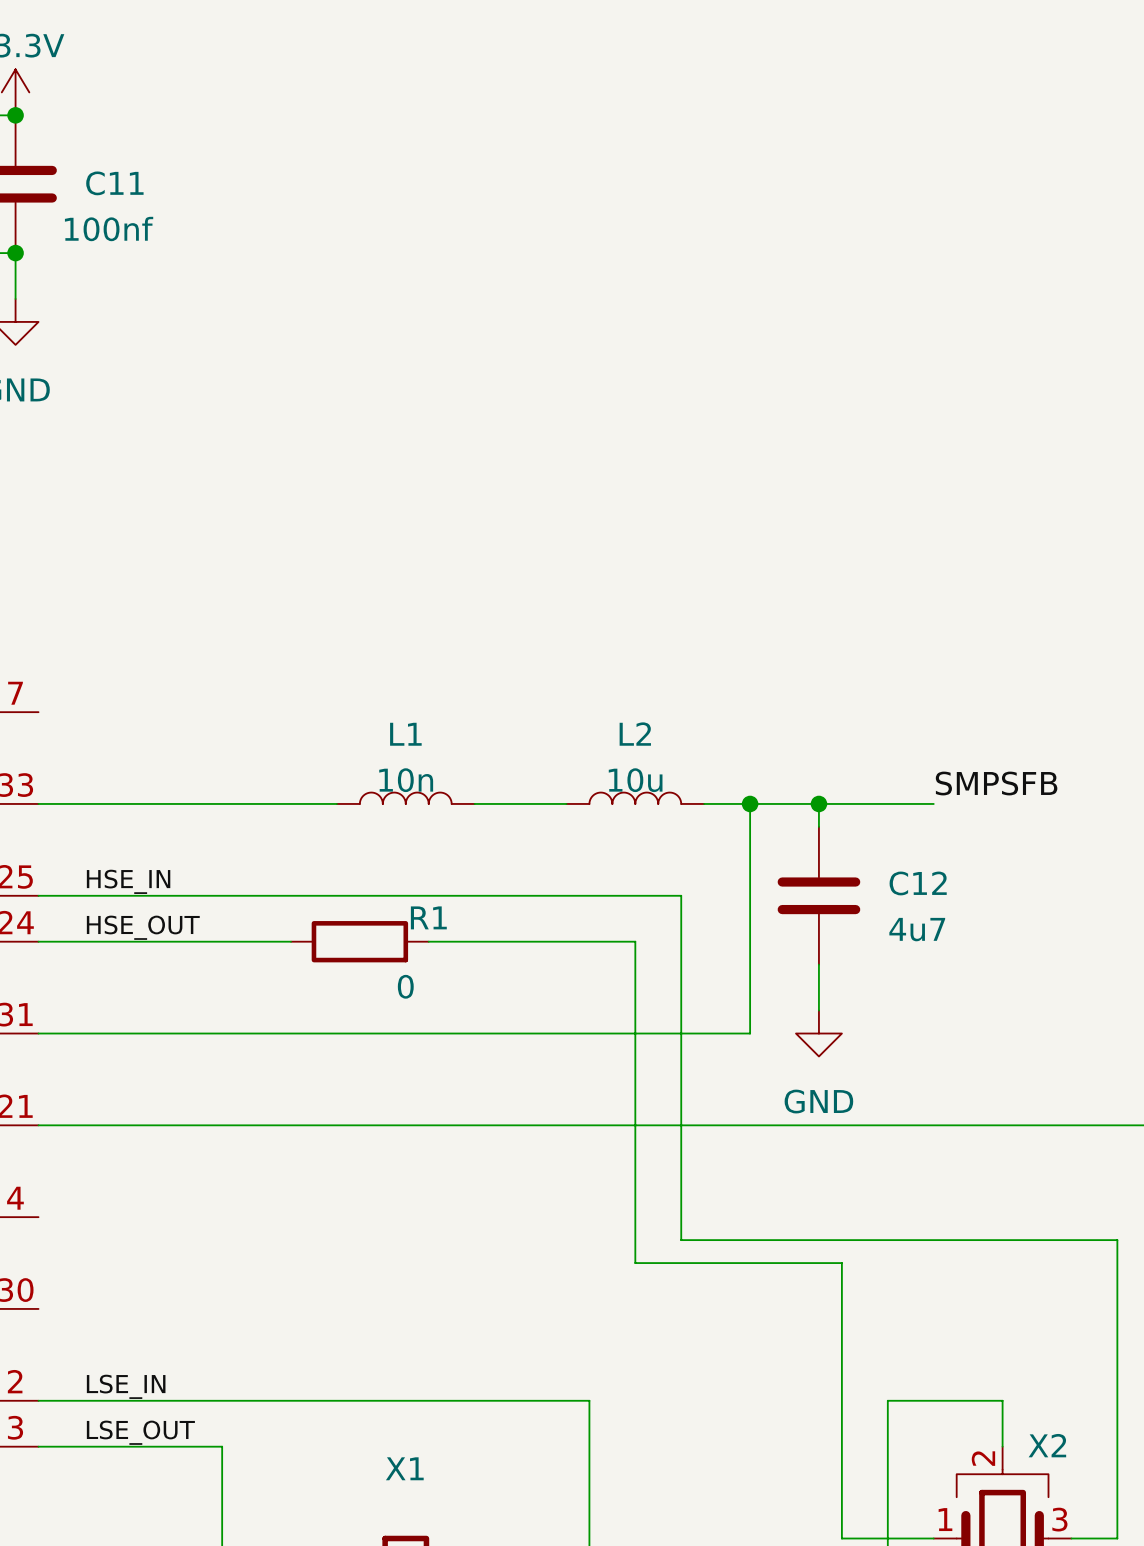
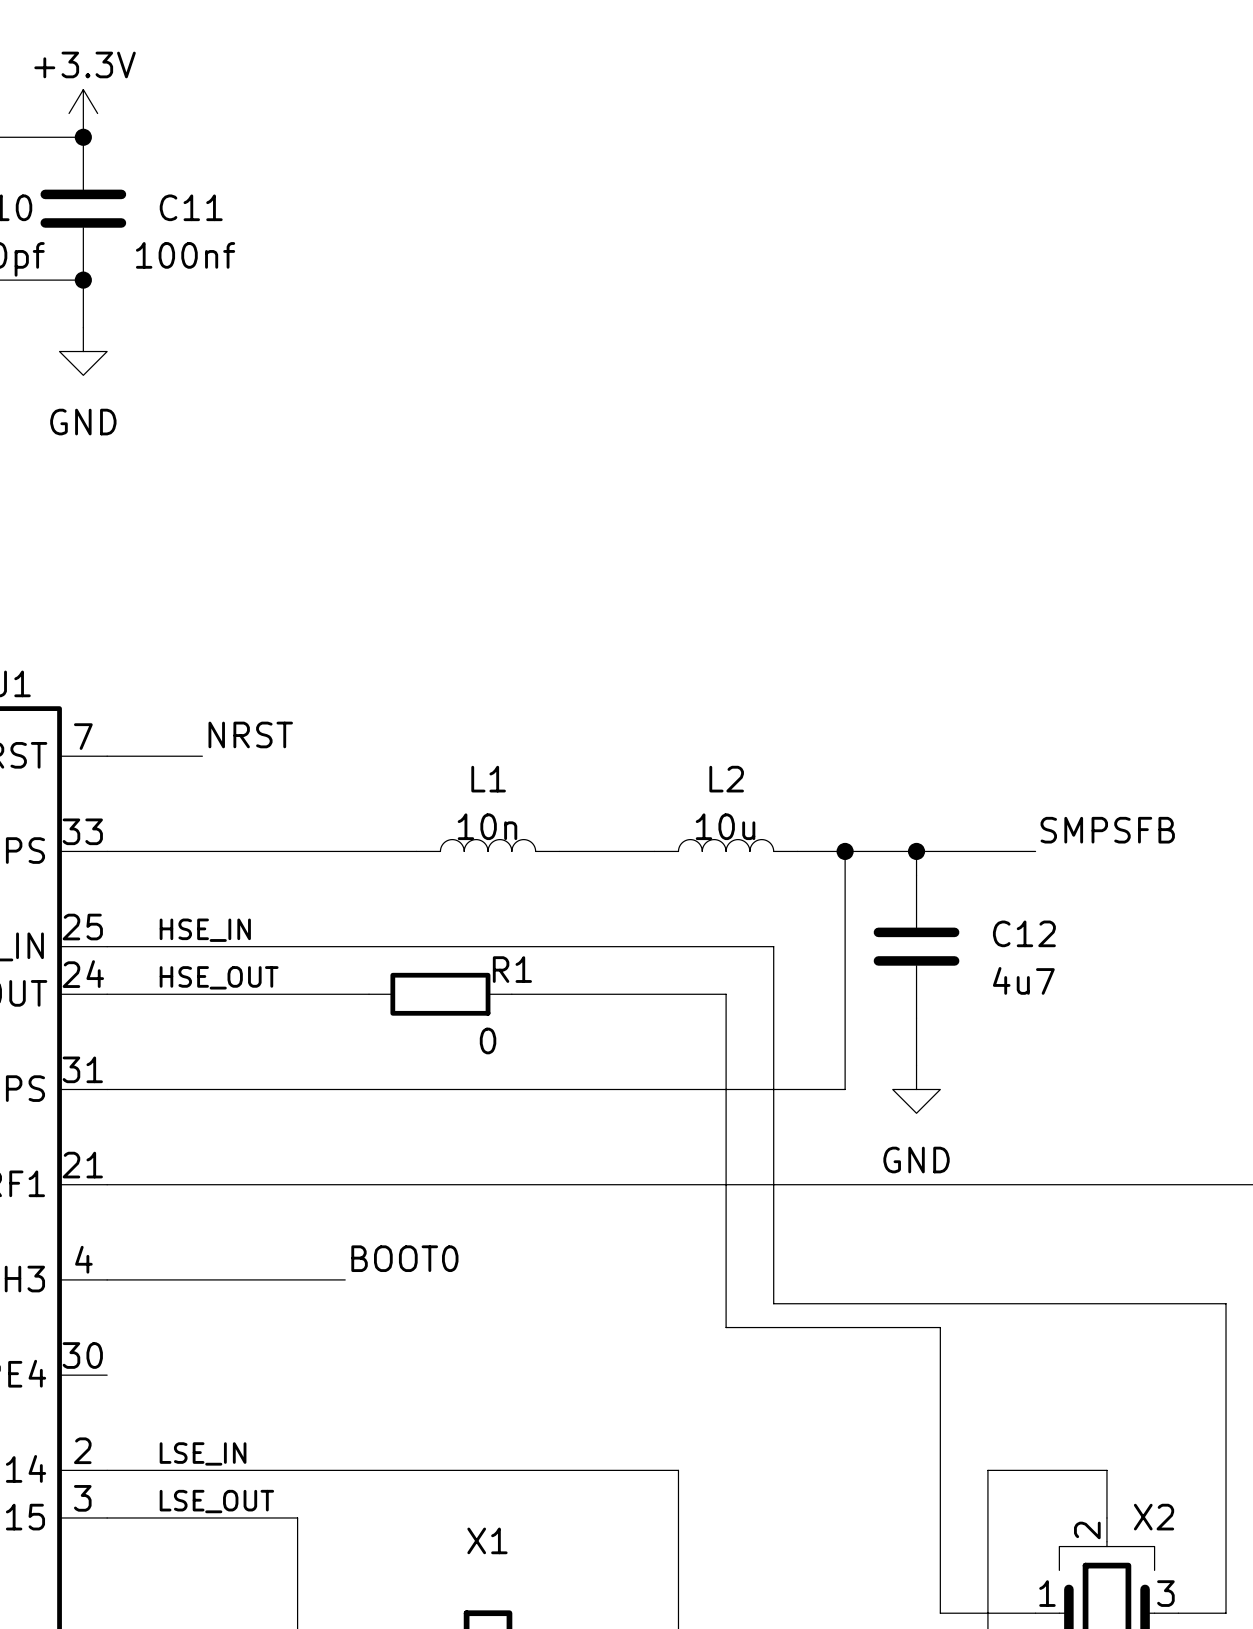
label: none -> NRST (250, 734)
wire: none -> (107, 756) (202, 756)
label: none -> BOOT0 (404, 1258)
wire: none -> (107, 1279) (345, 1279)

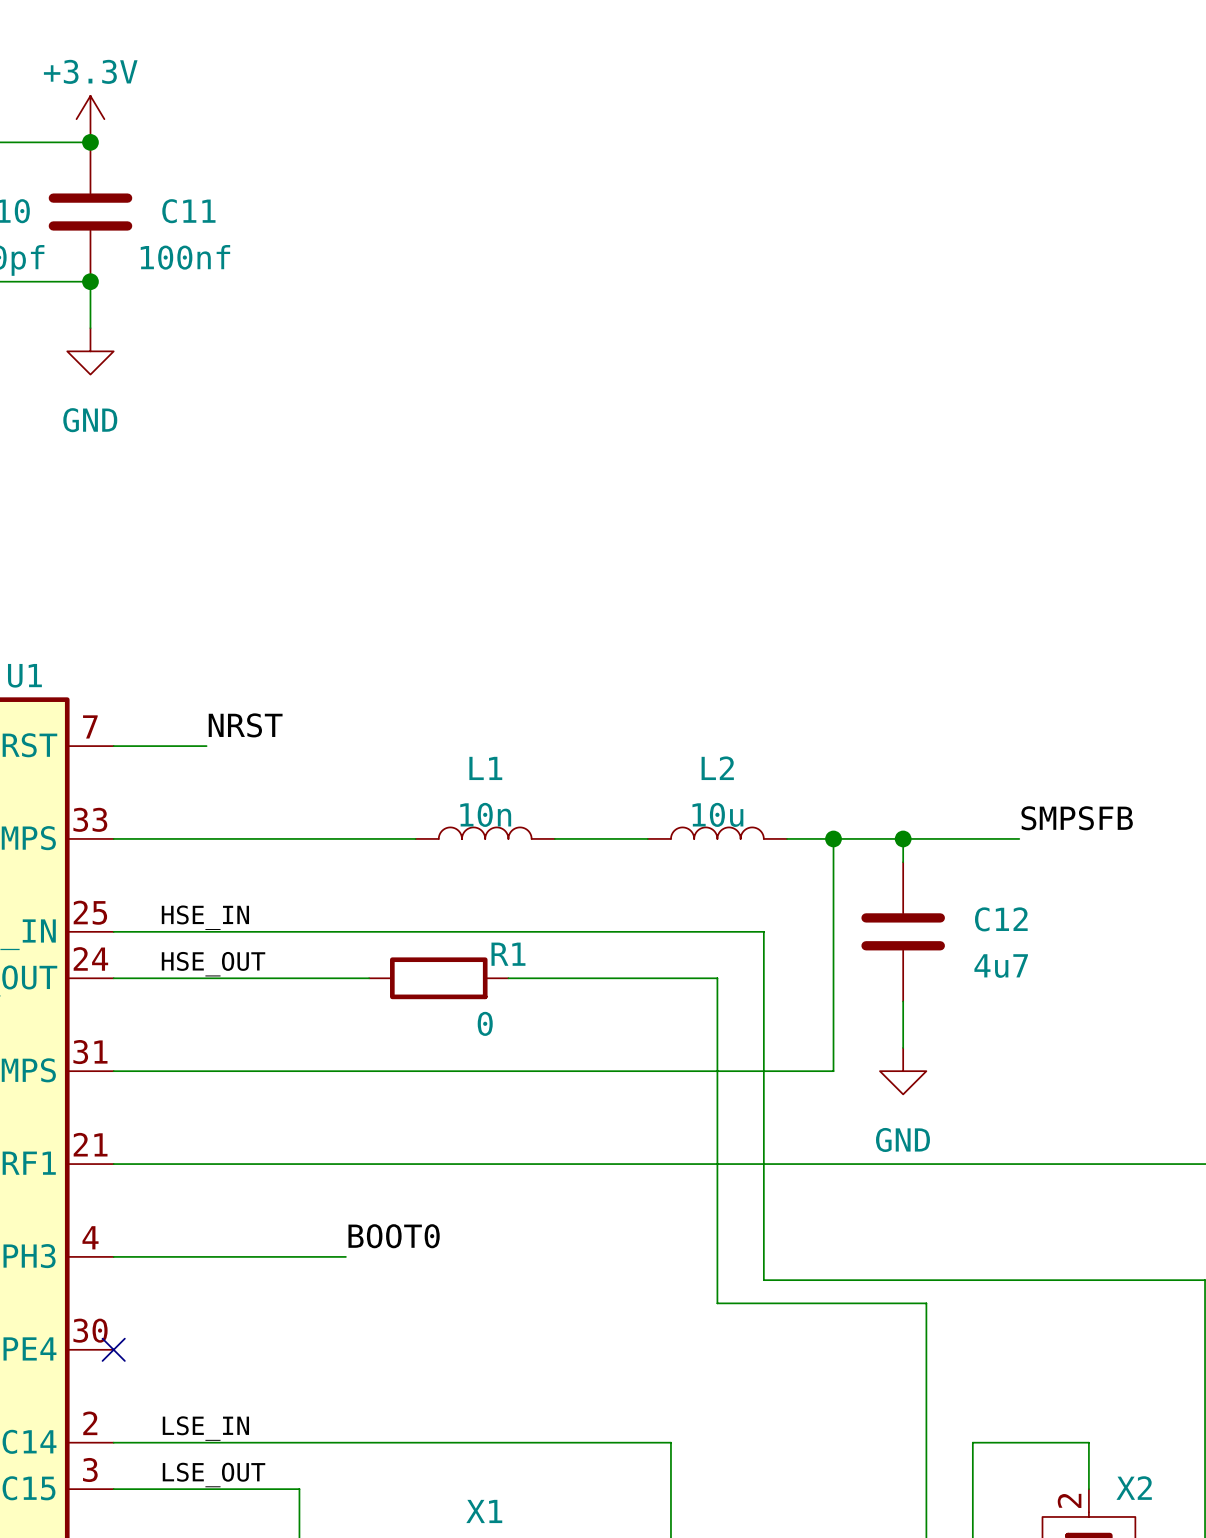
no-connect mark: none -> (113, 1349)

